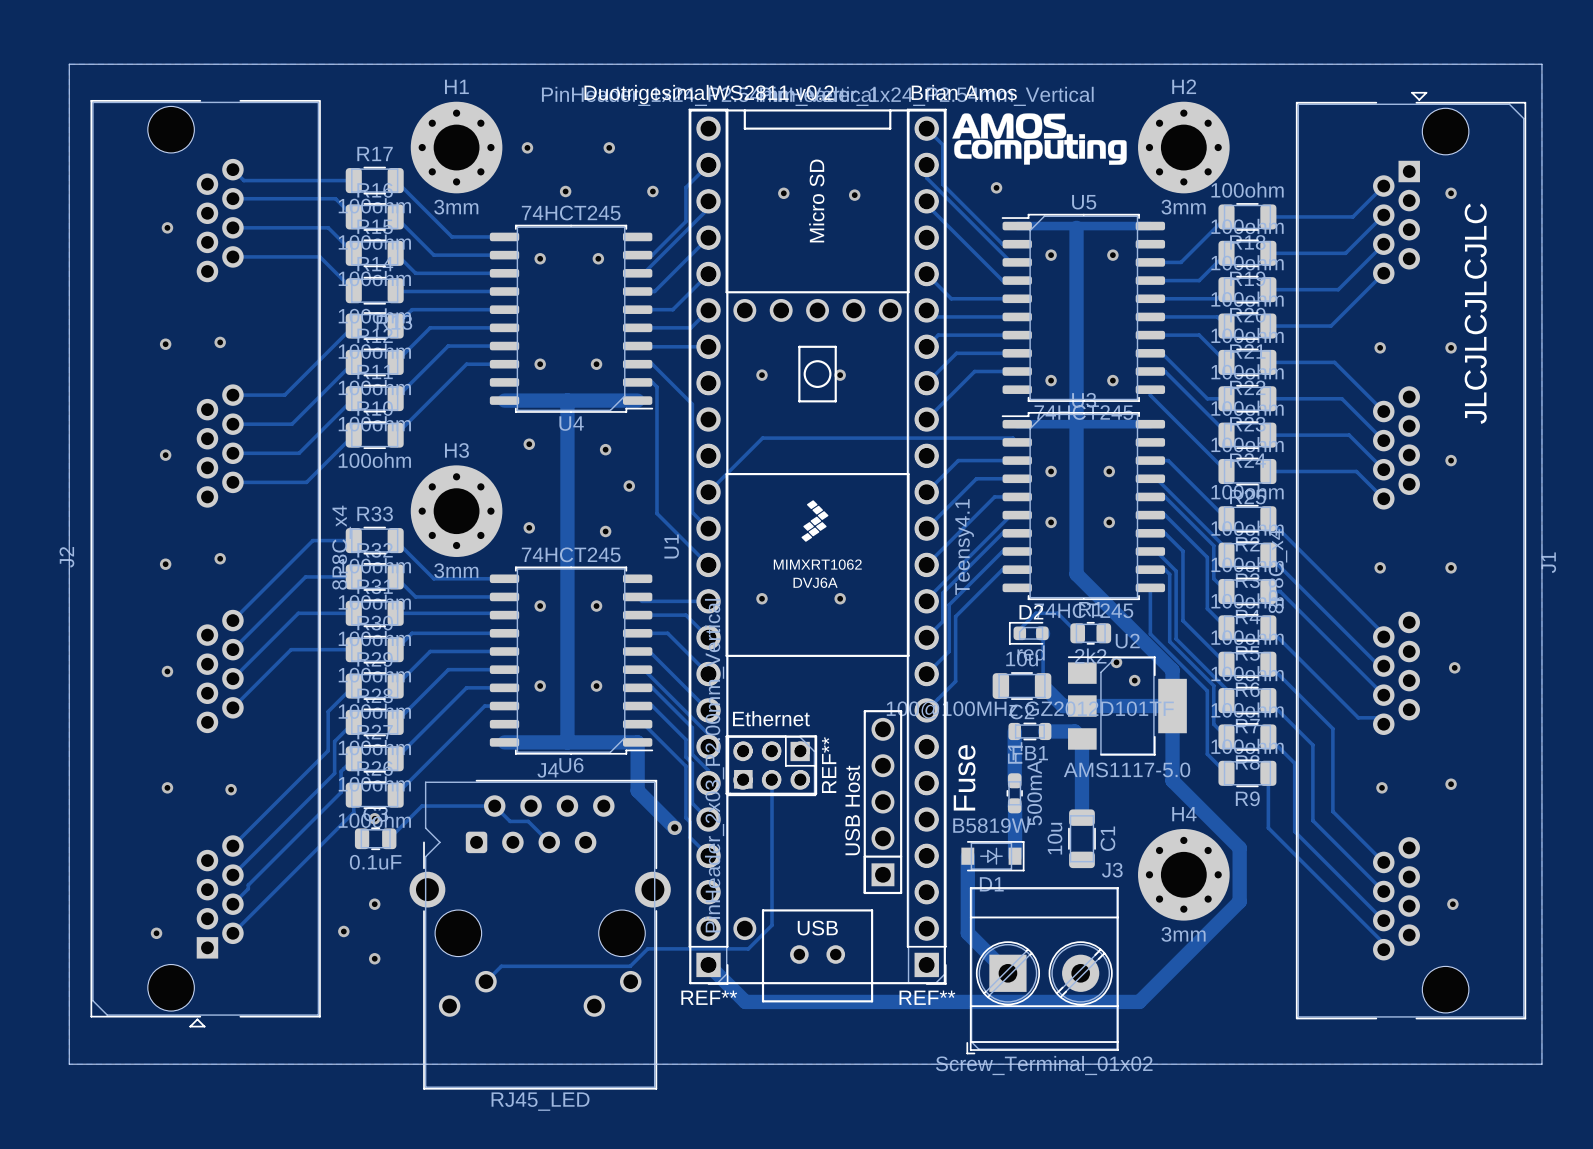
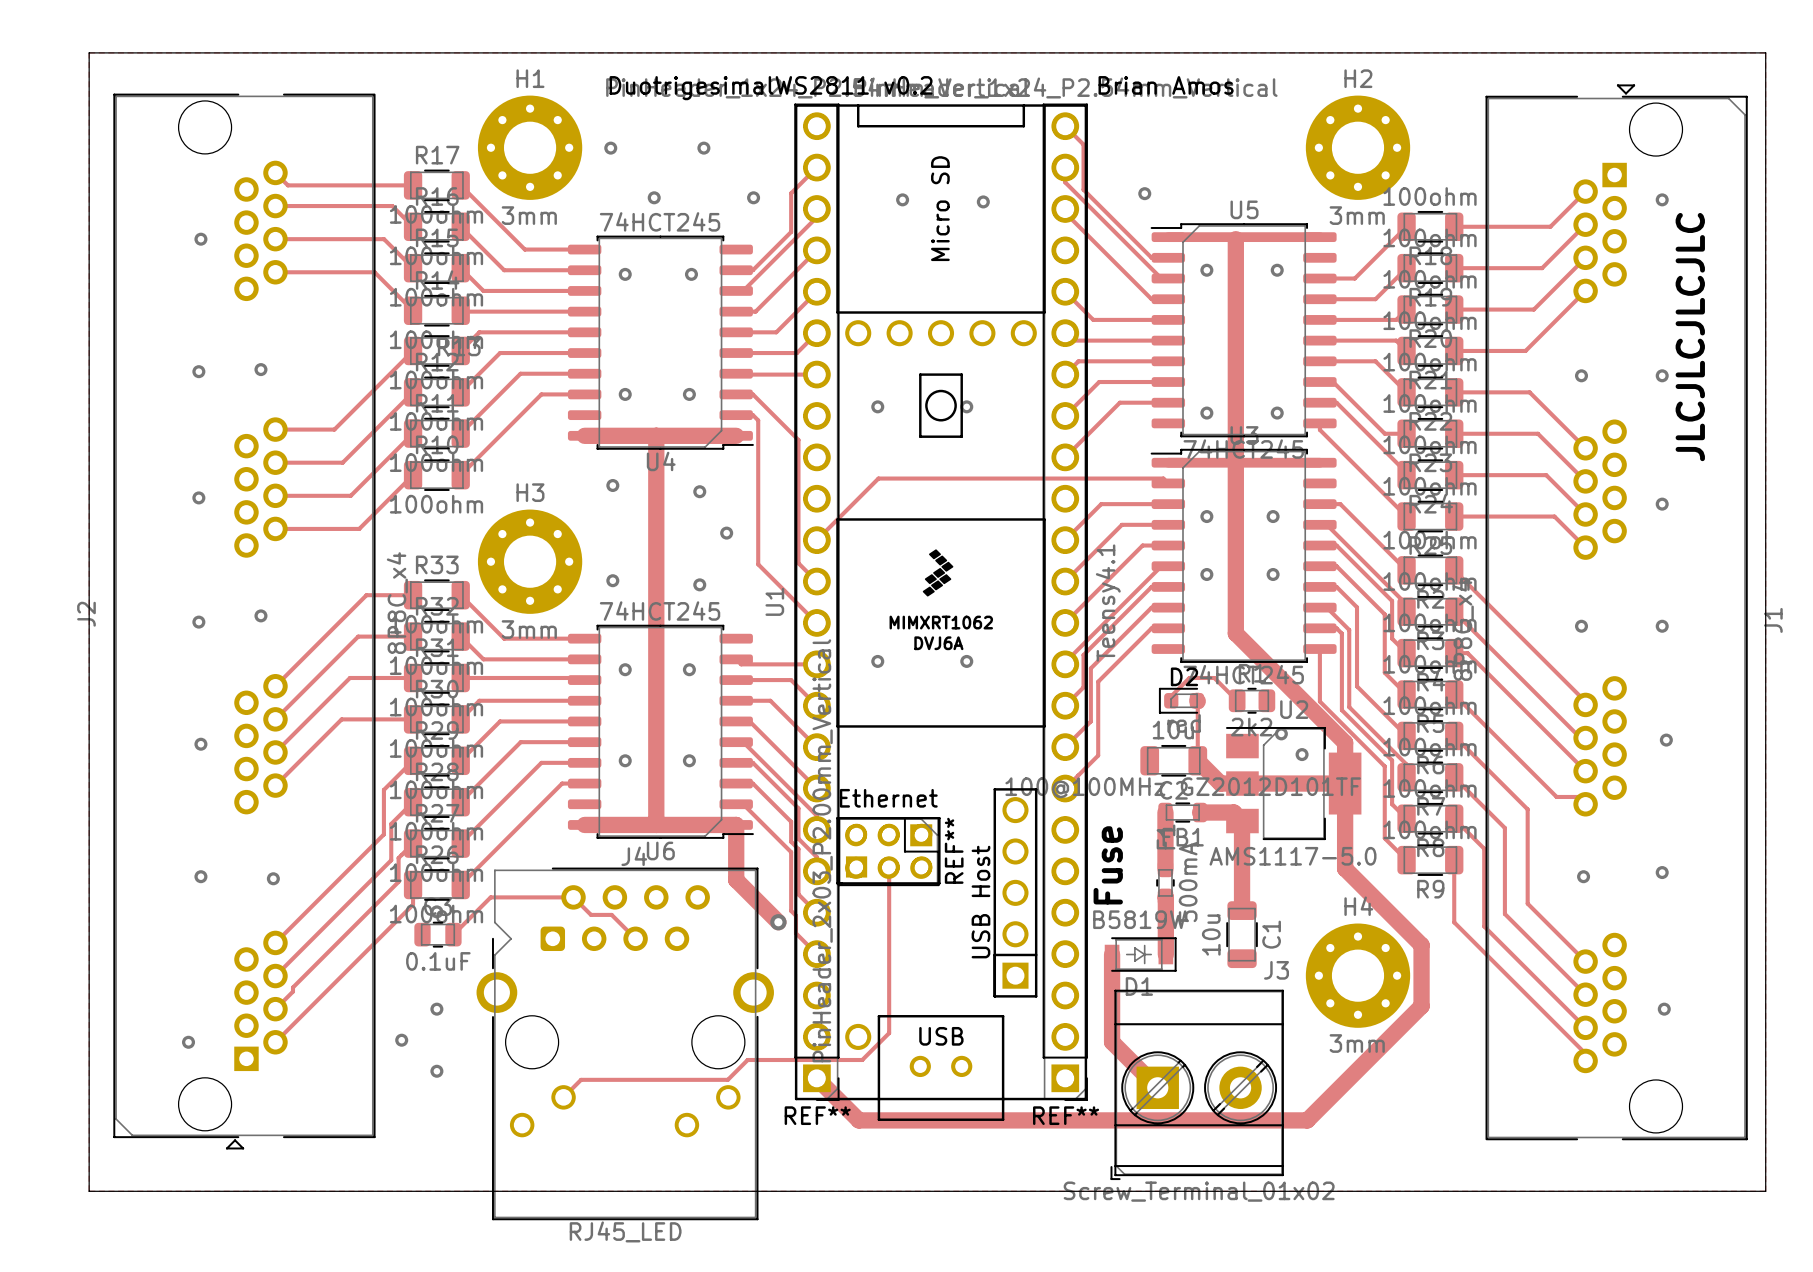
drawing: [952, 113, 1127, 165] -> none

